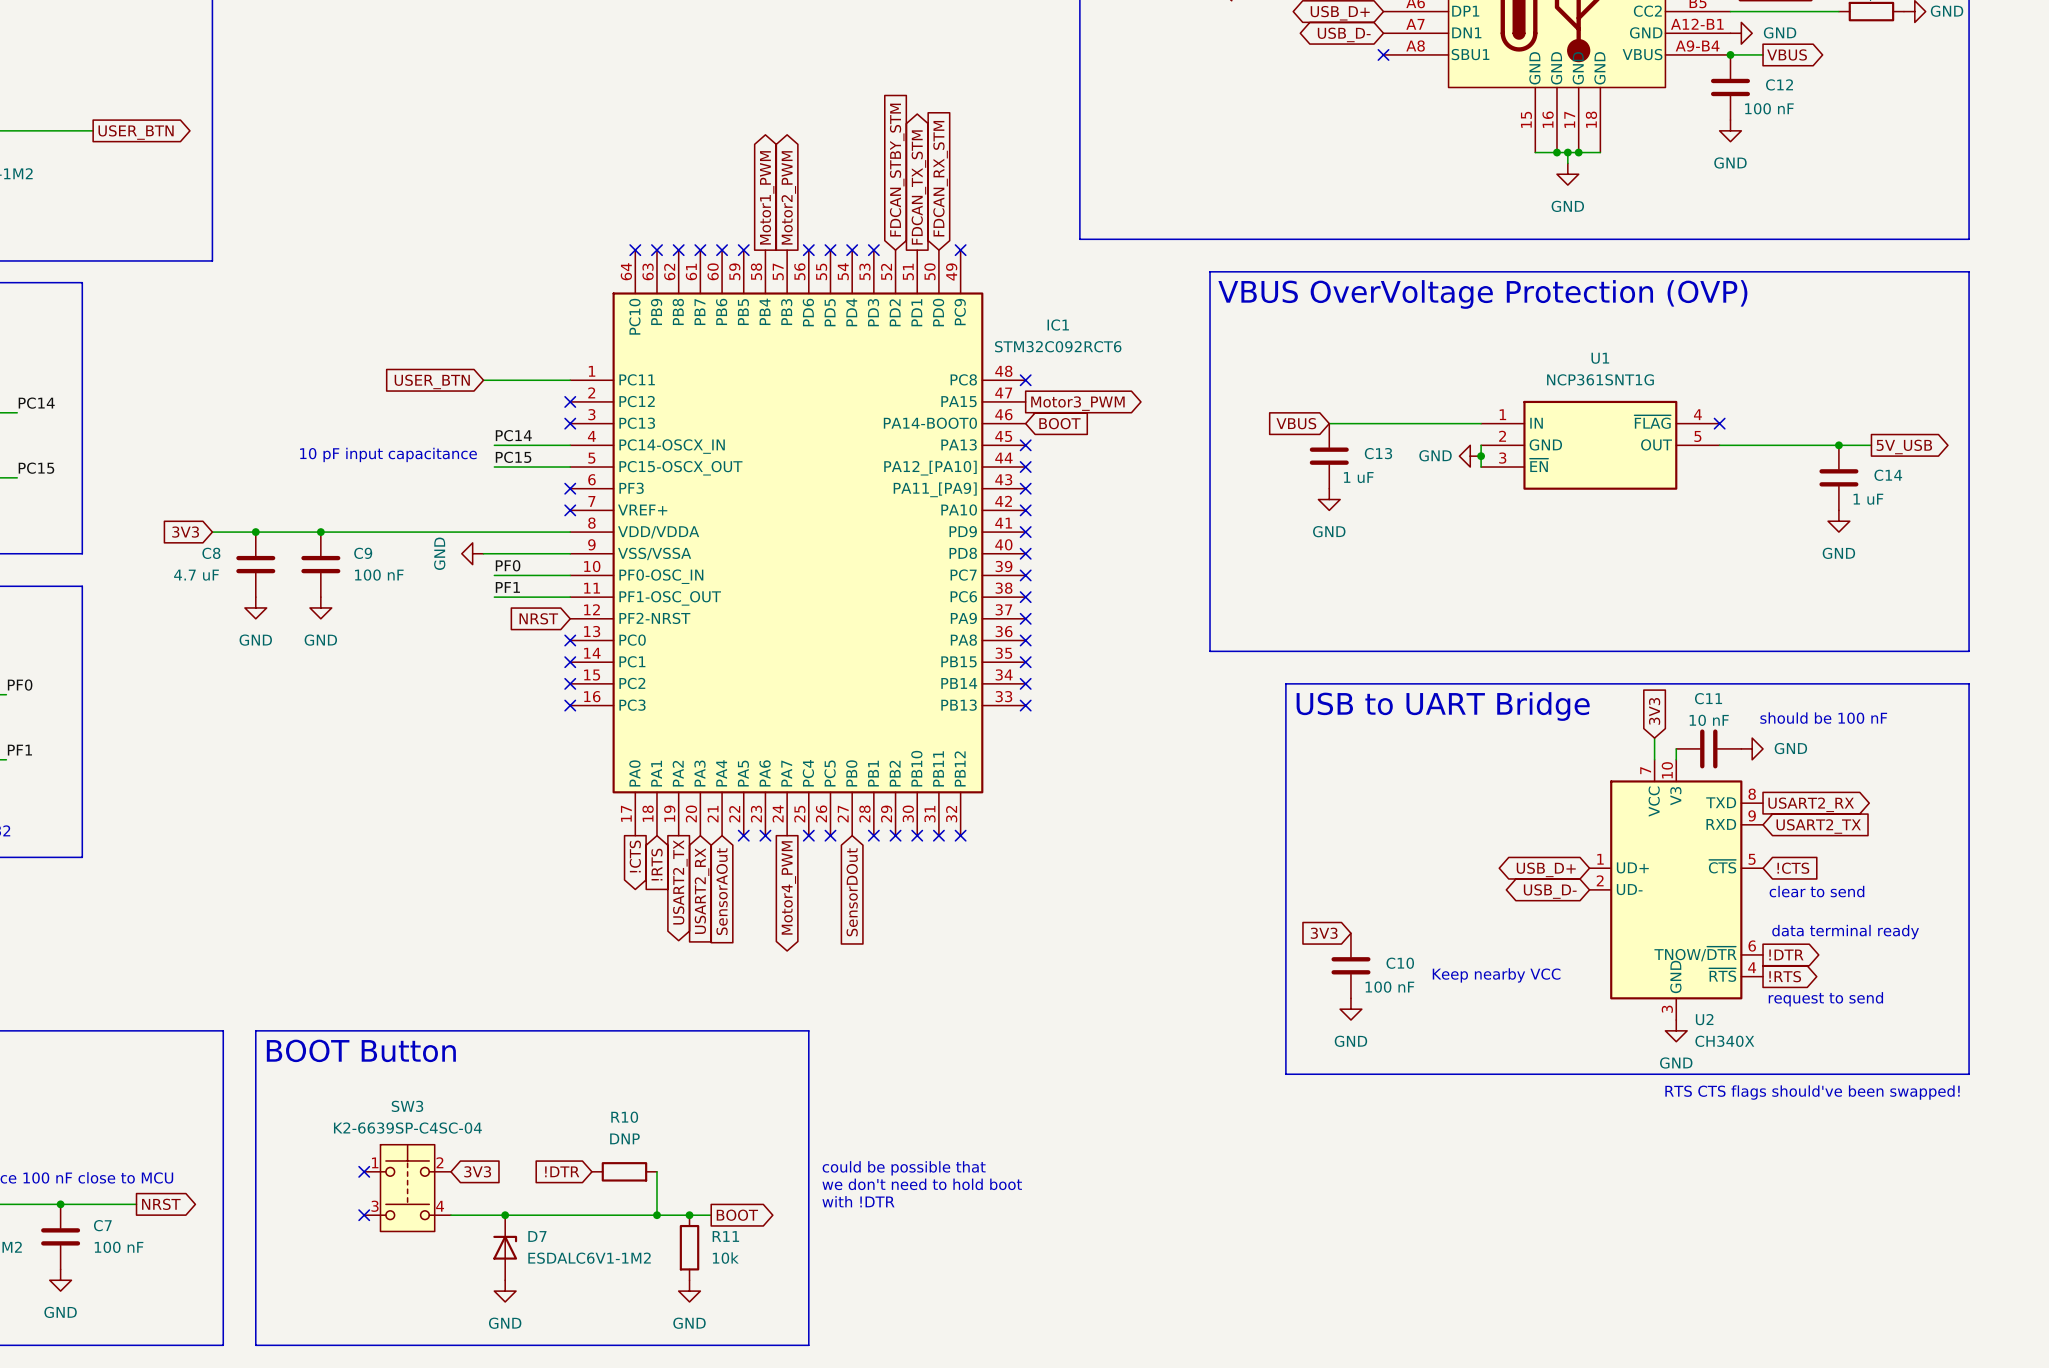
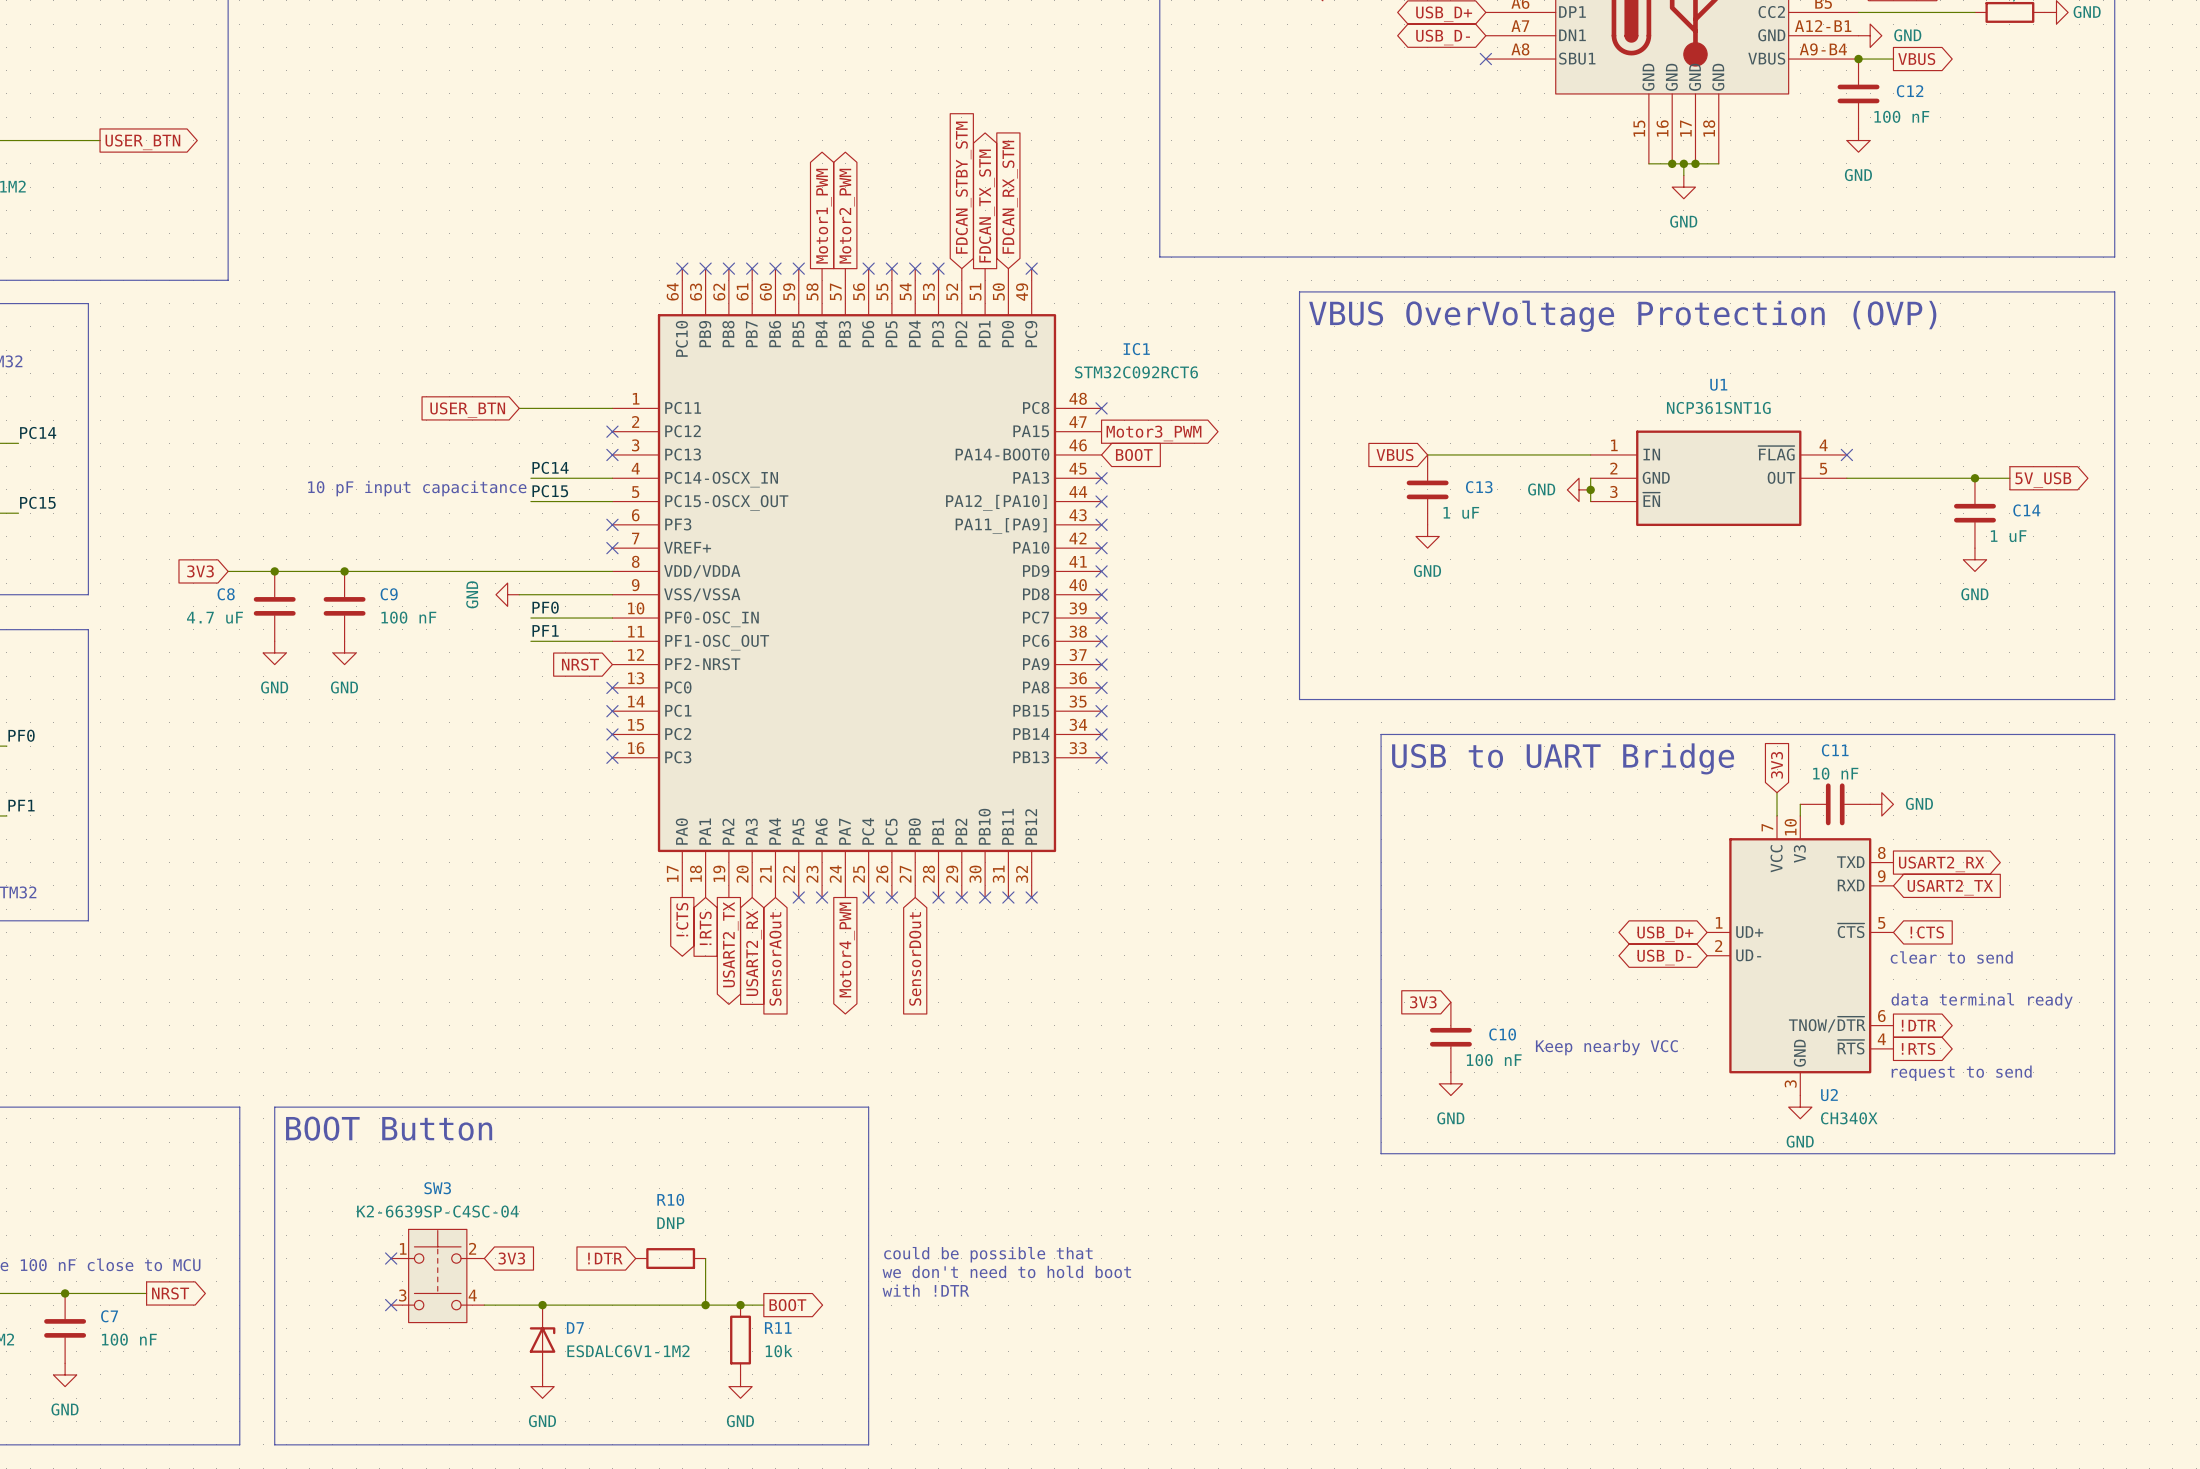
text: should be 100 nF (1823, 718) -> none
text: RTS CTS flags should've been swapped! (1812, 1092) -> none

